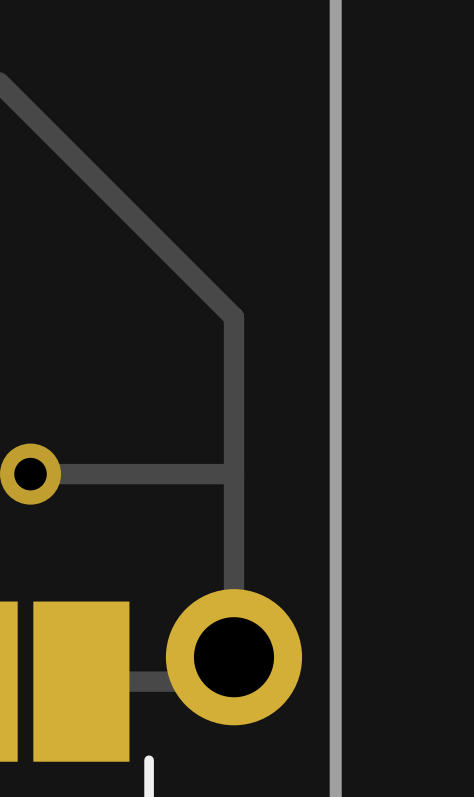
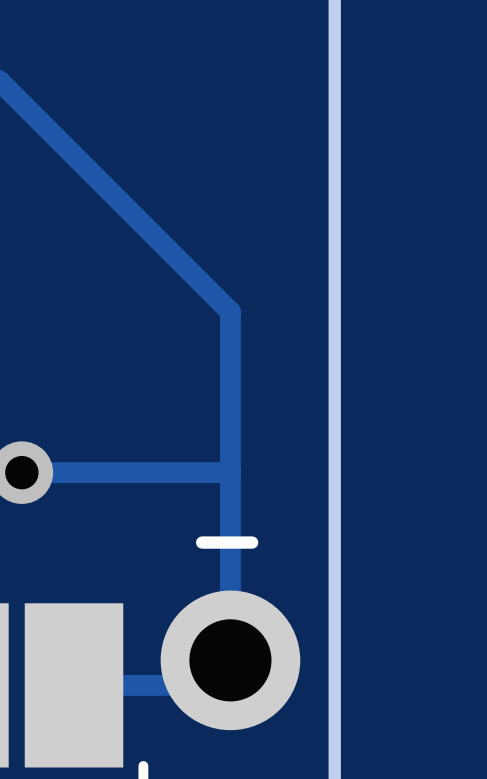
text: none -> - (227, 542)

